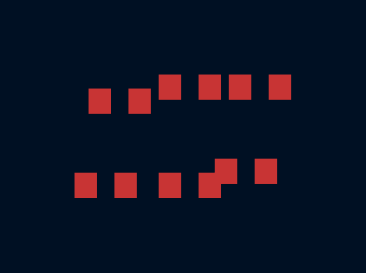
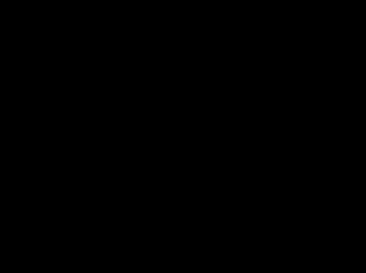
part: (189, 87) -> none
part: (259, 87) -> none
part: (119, 101) -> none
part: (245, 171) -> none
part: (105, 185) -> none
part: (189, 185) -> none

